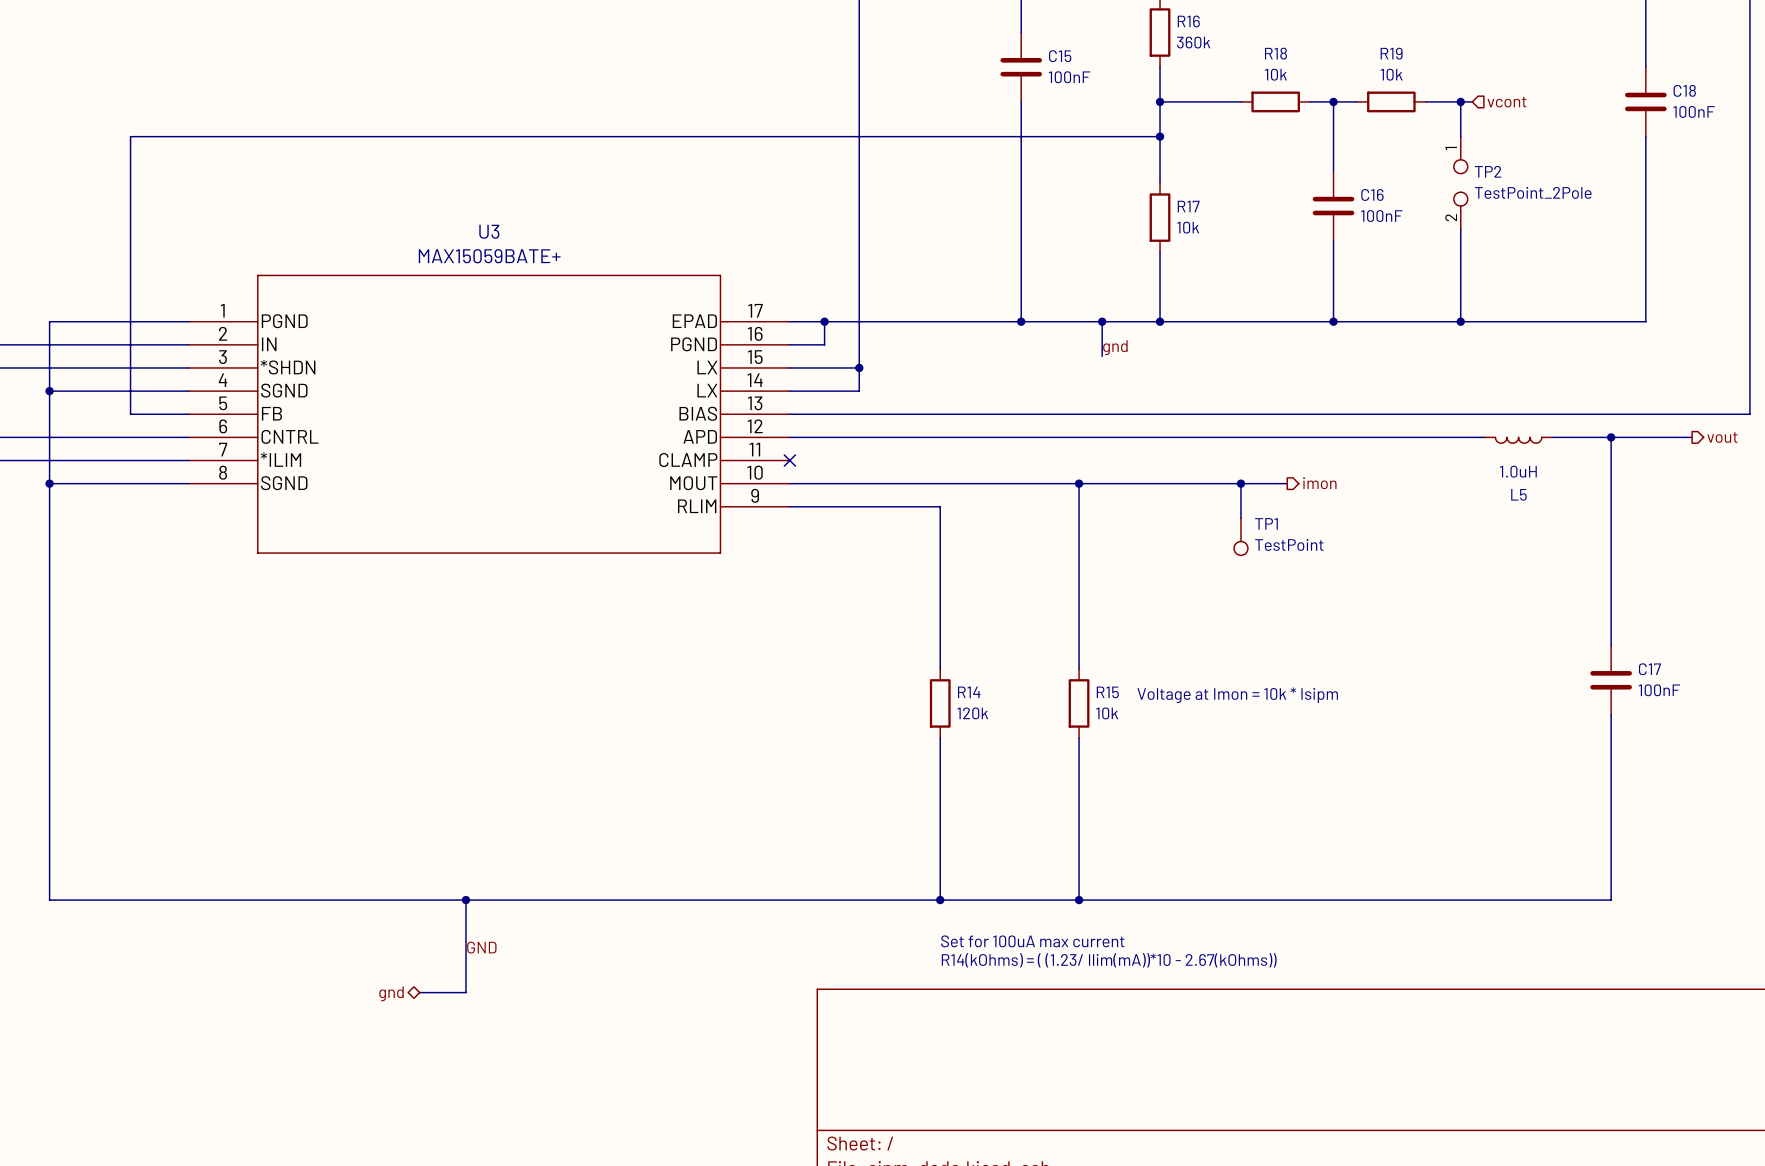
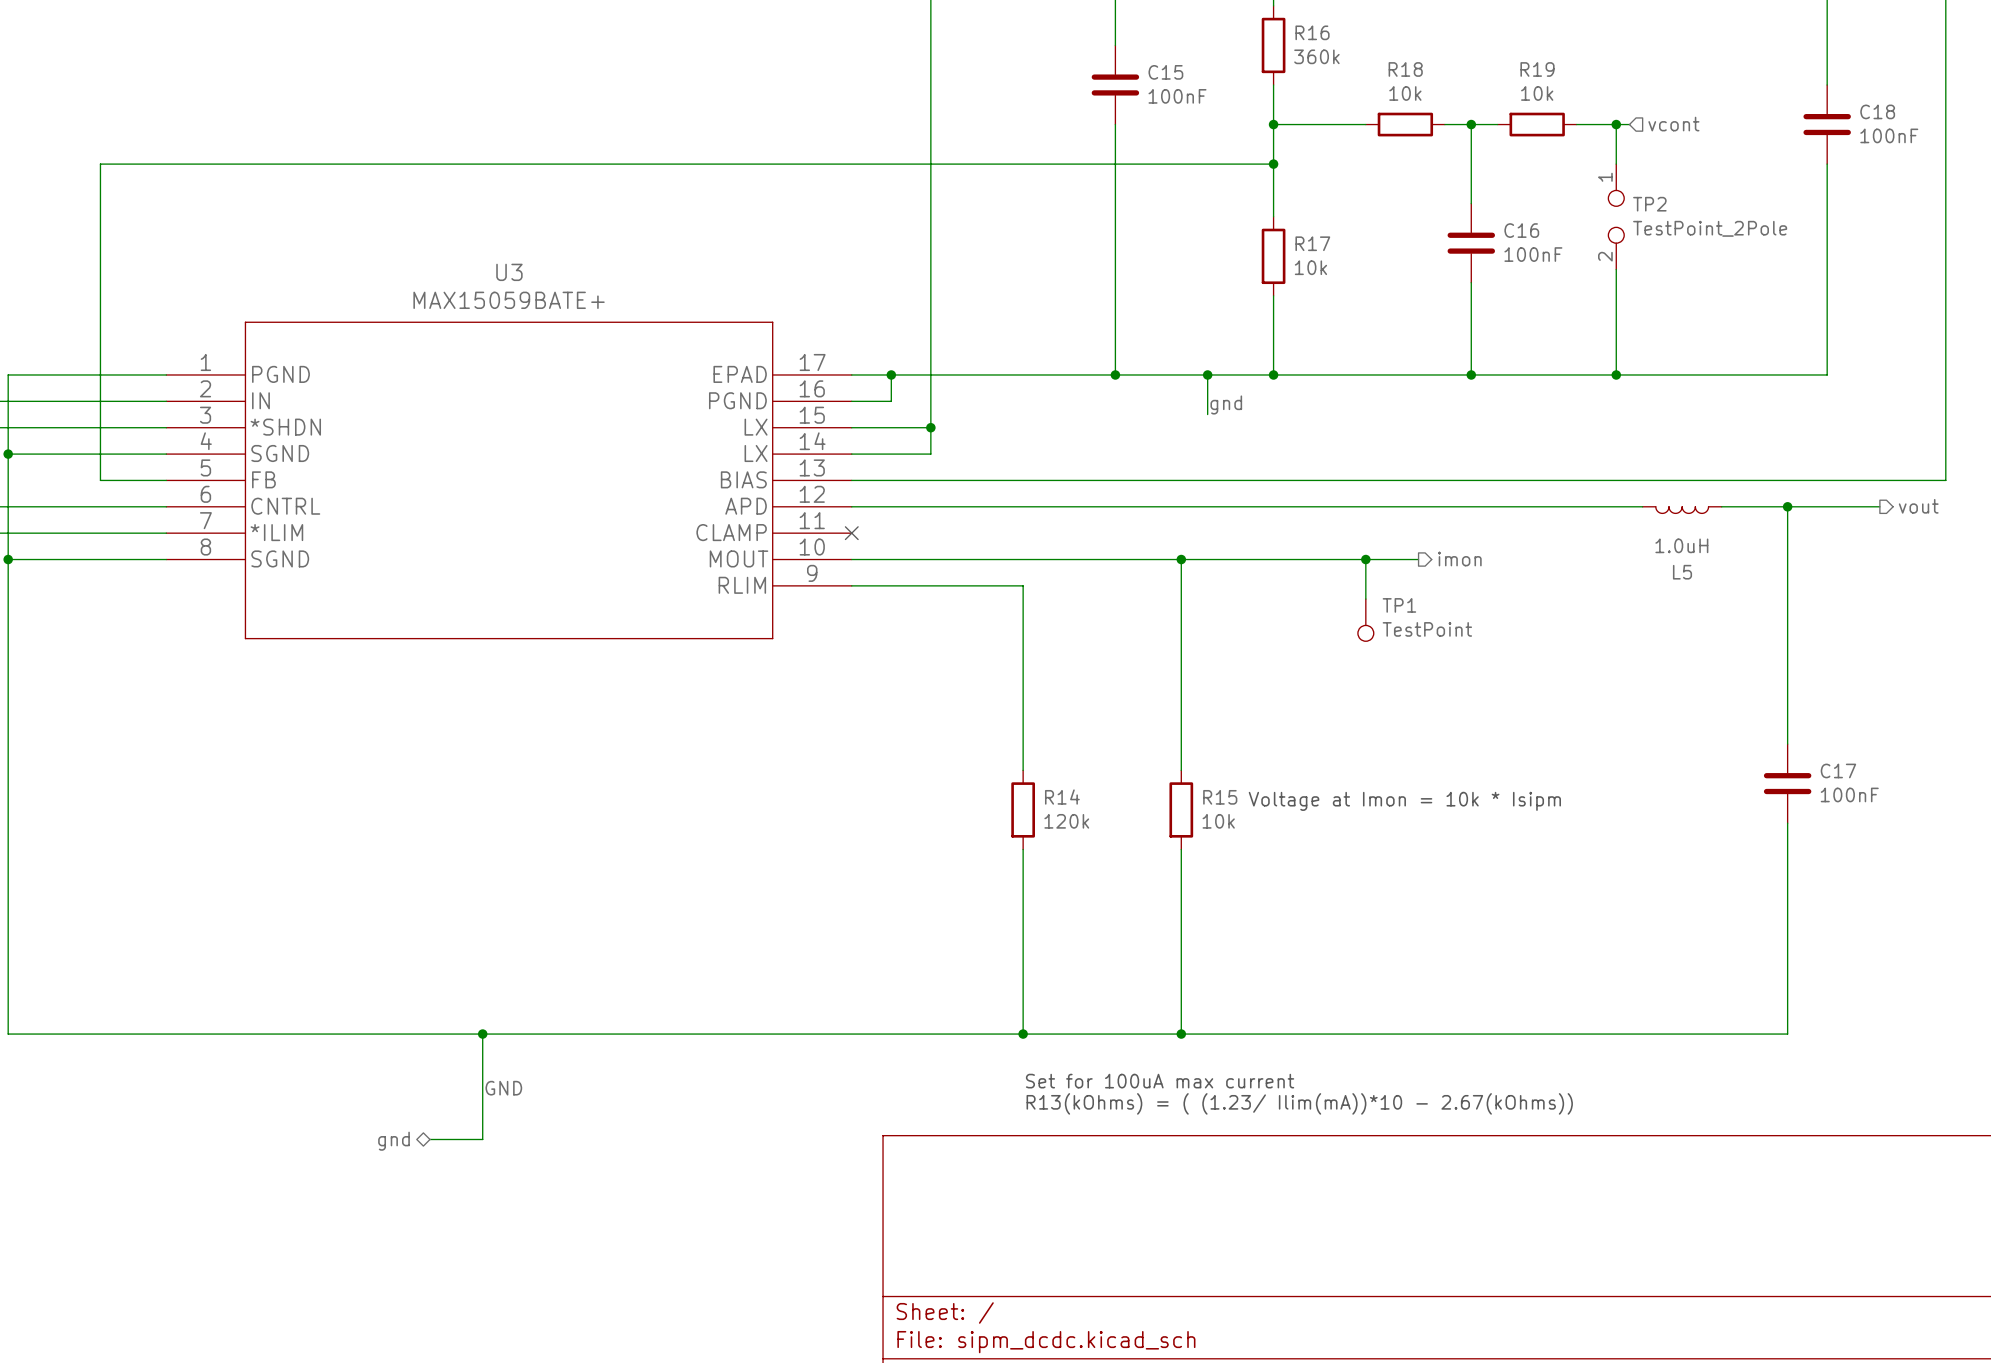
text: R14(kOhms) = ( (1.23/ Ilim(mA))*10 - 2.67(kOhms)) (1109, 960) -> R13(kOhms) = ( (1.23/ Ilim(mA))*10 - 2.67(kOhms)) (1299, 1103)

